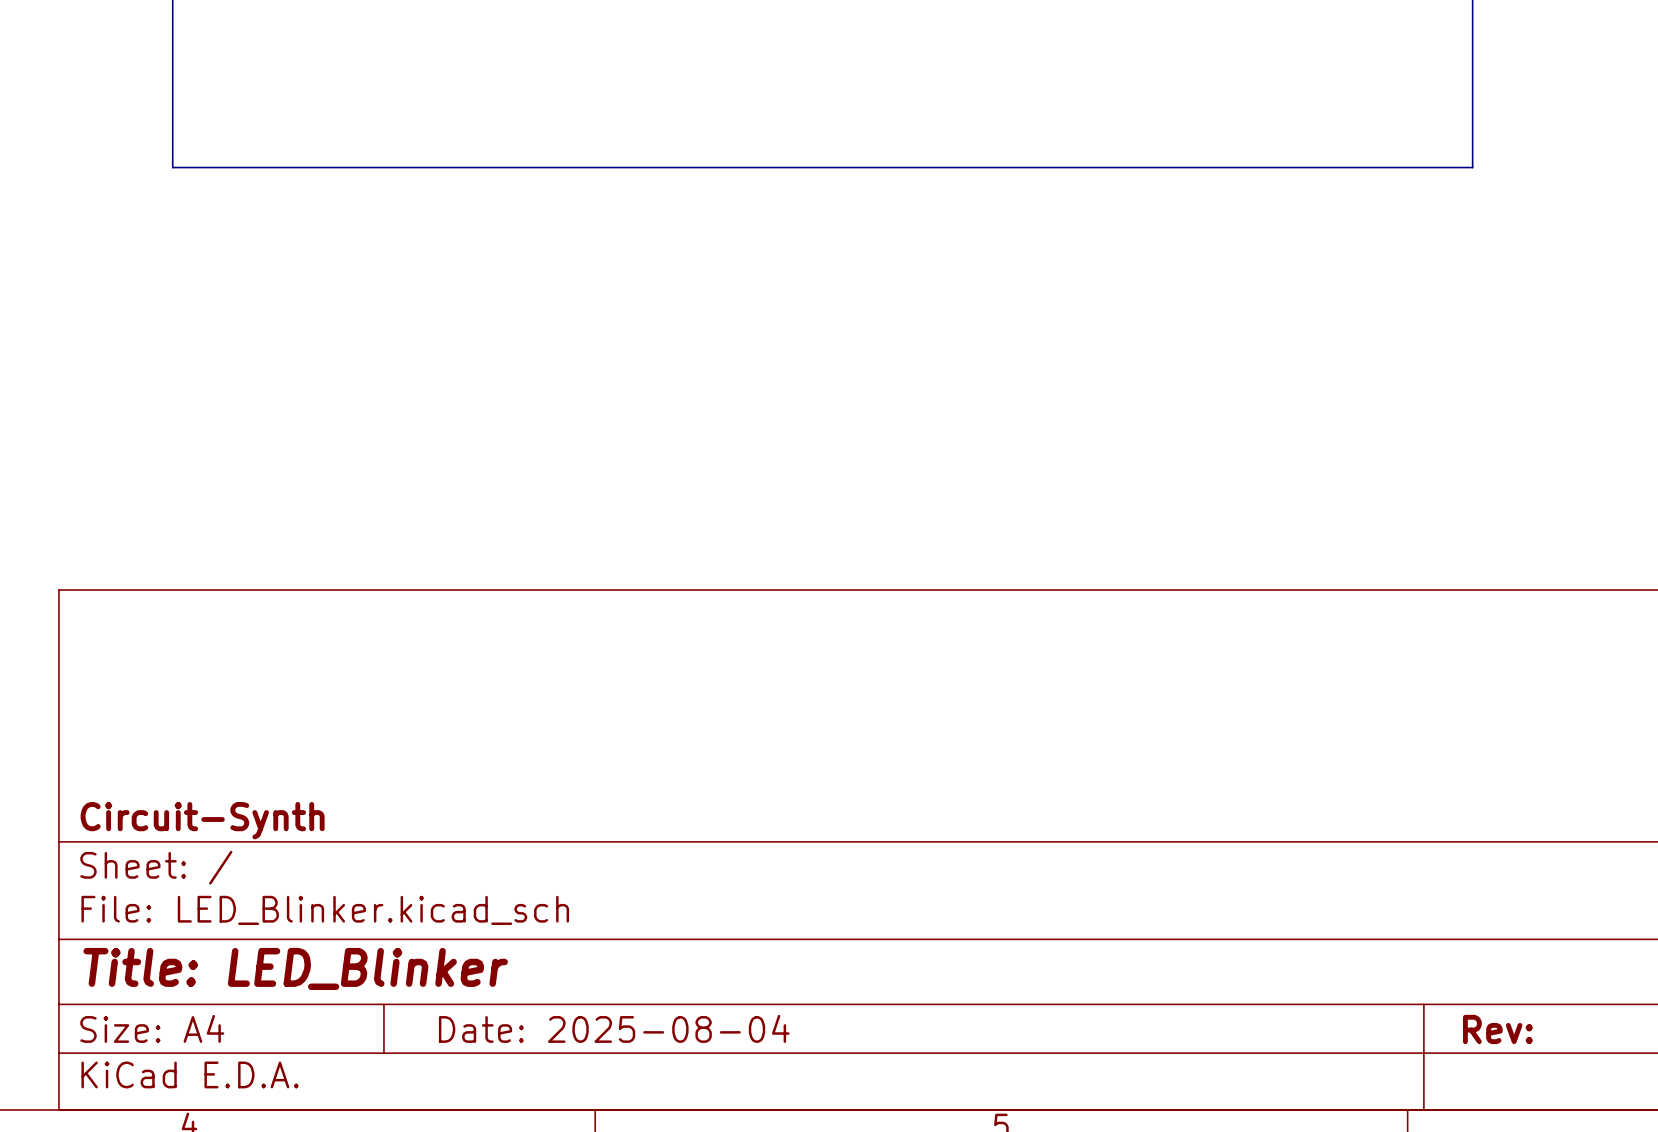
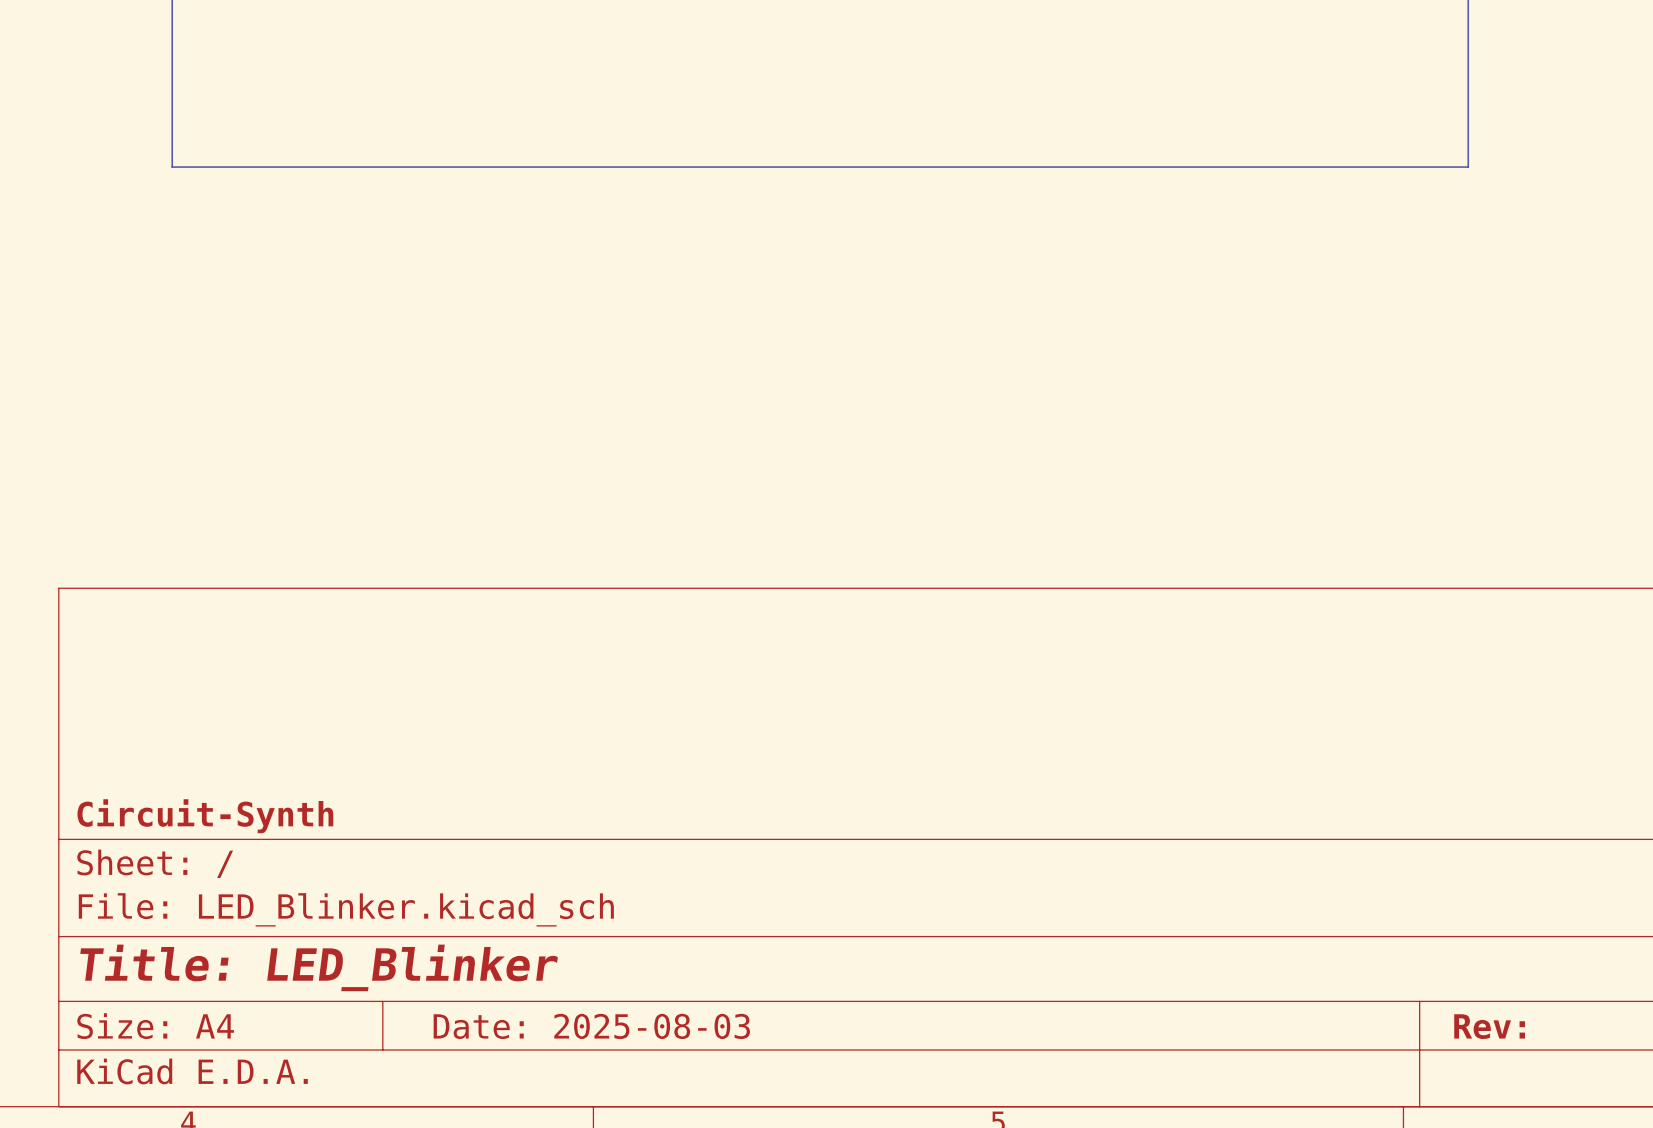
title block: Date: 2025-08-04 (614, 1028) -> Date: 2025-08-03 (591, 1026)

